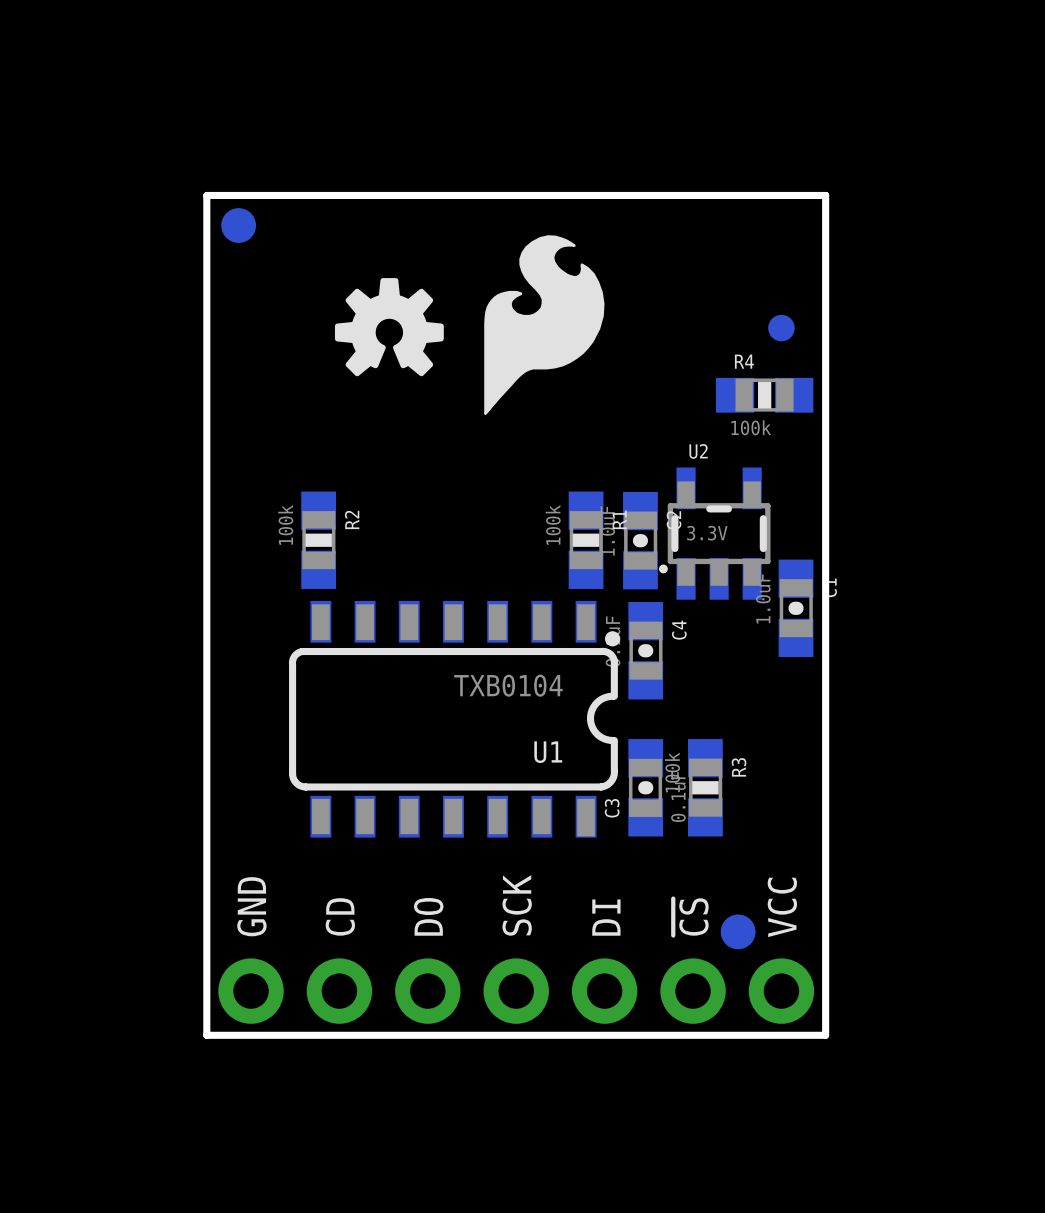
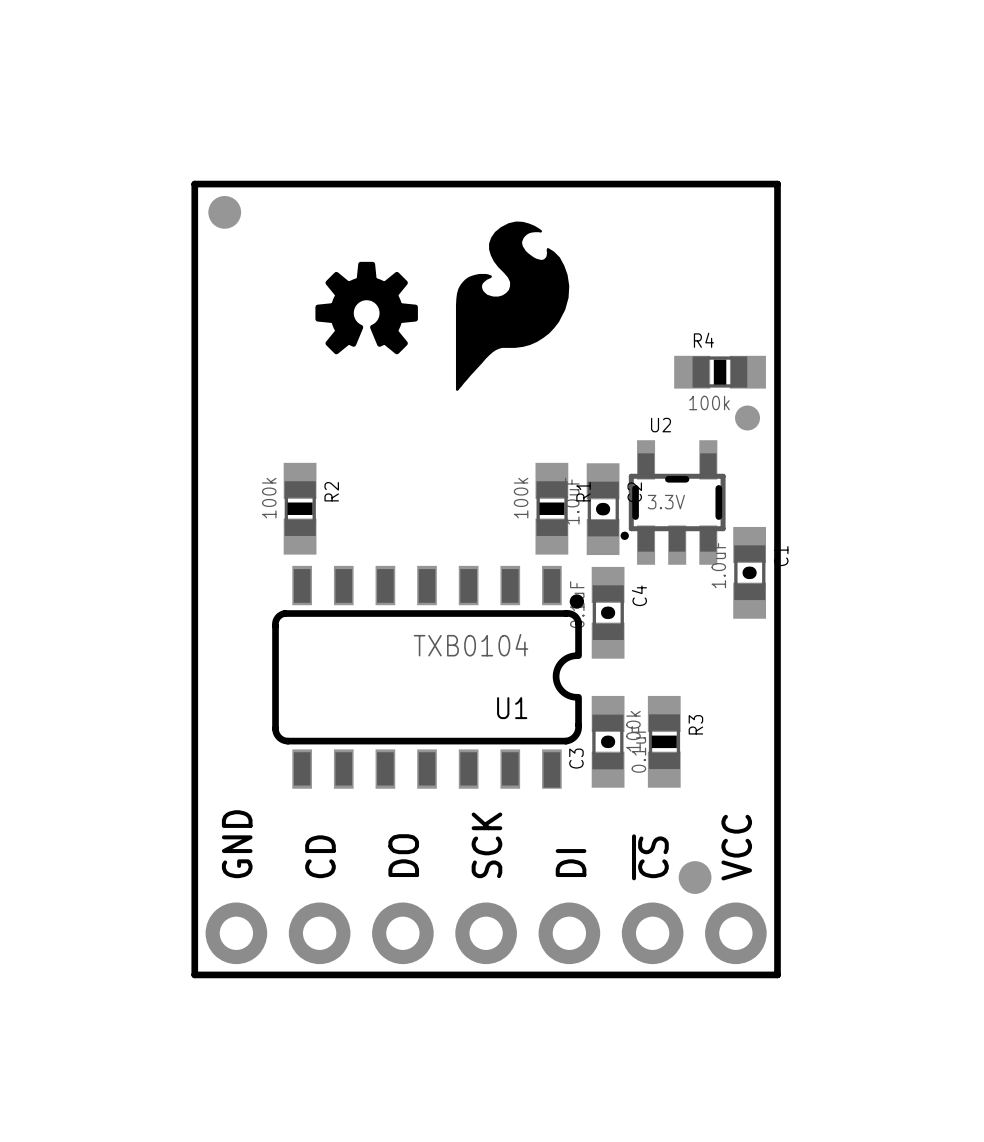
part position: (781, 328) -> (747, 417)

